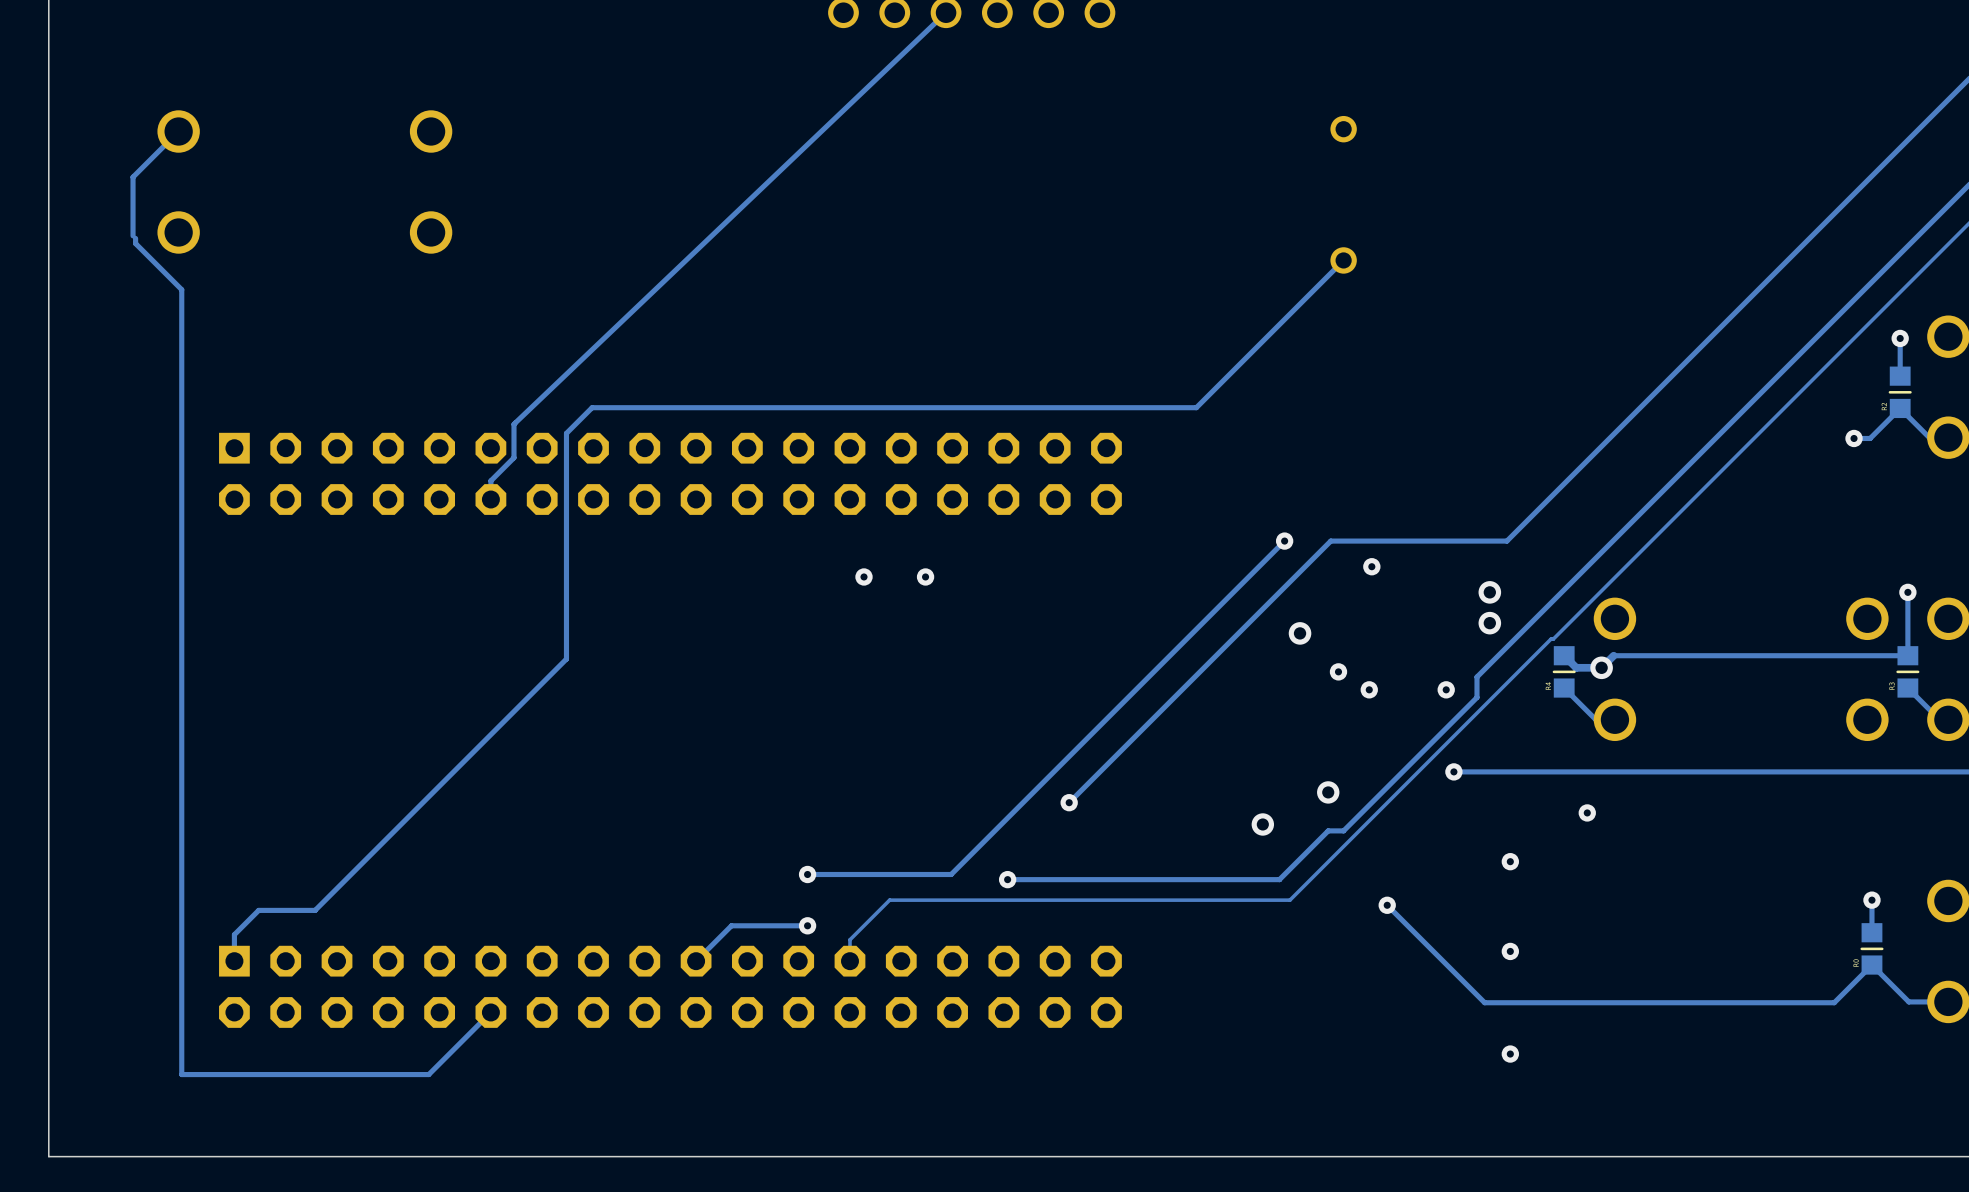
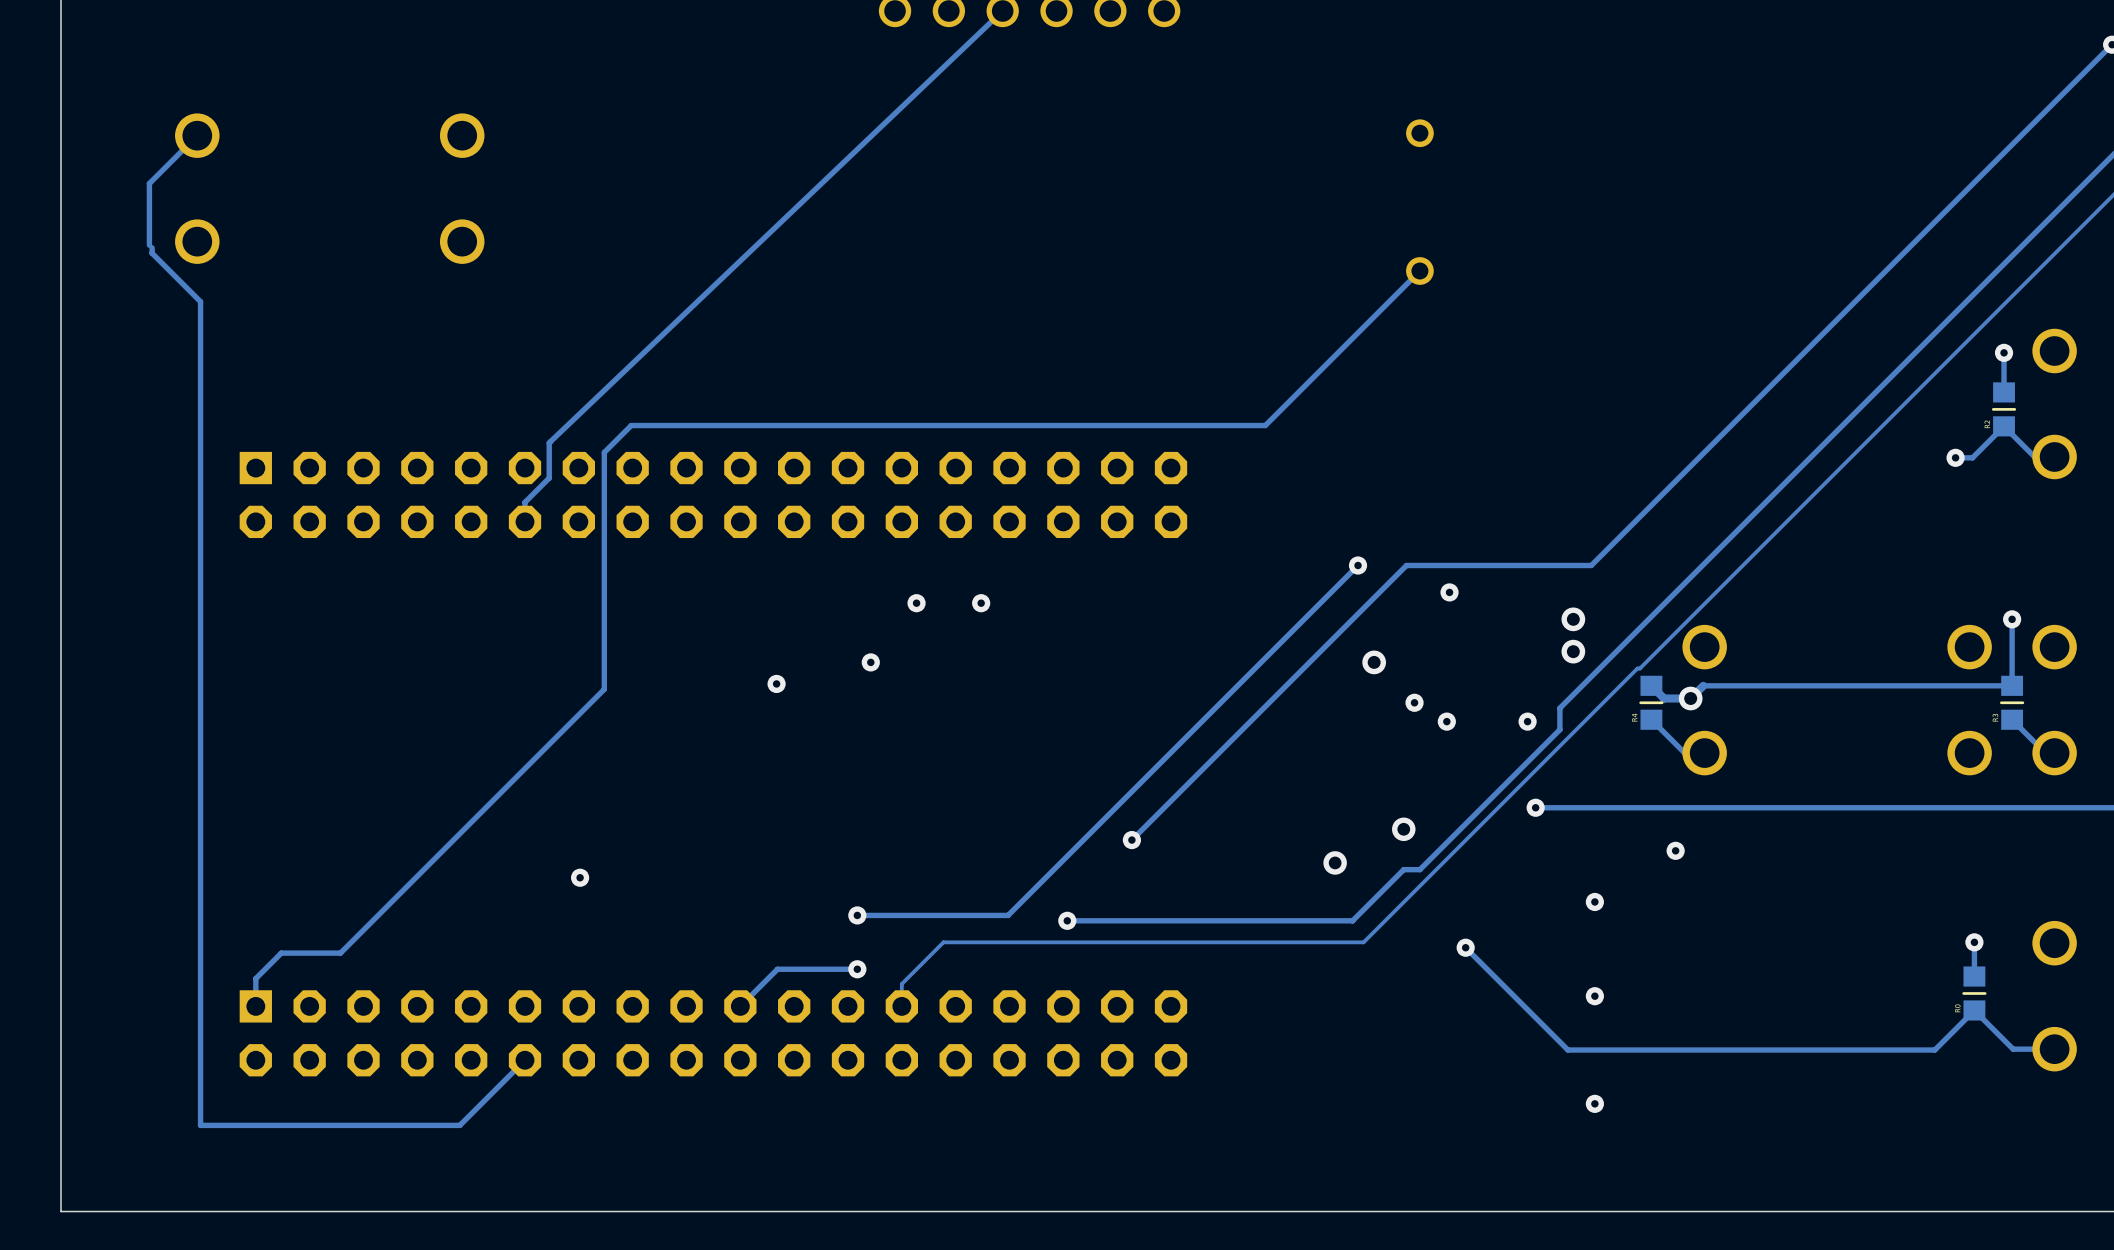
via: none -> (870, 662)
via: none -> (776, 683)
via: none -> (580, 877)

